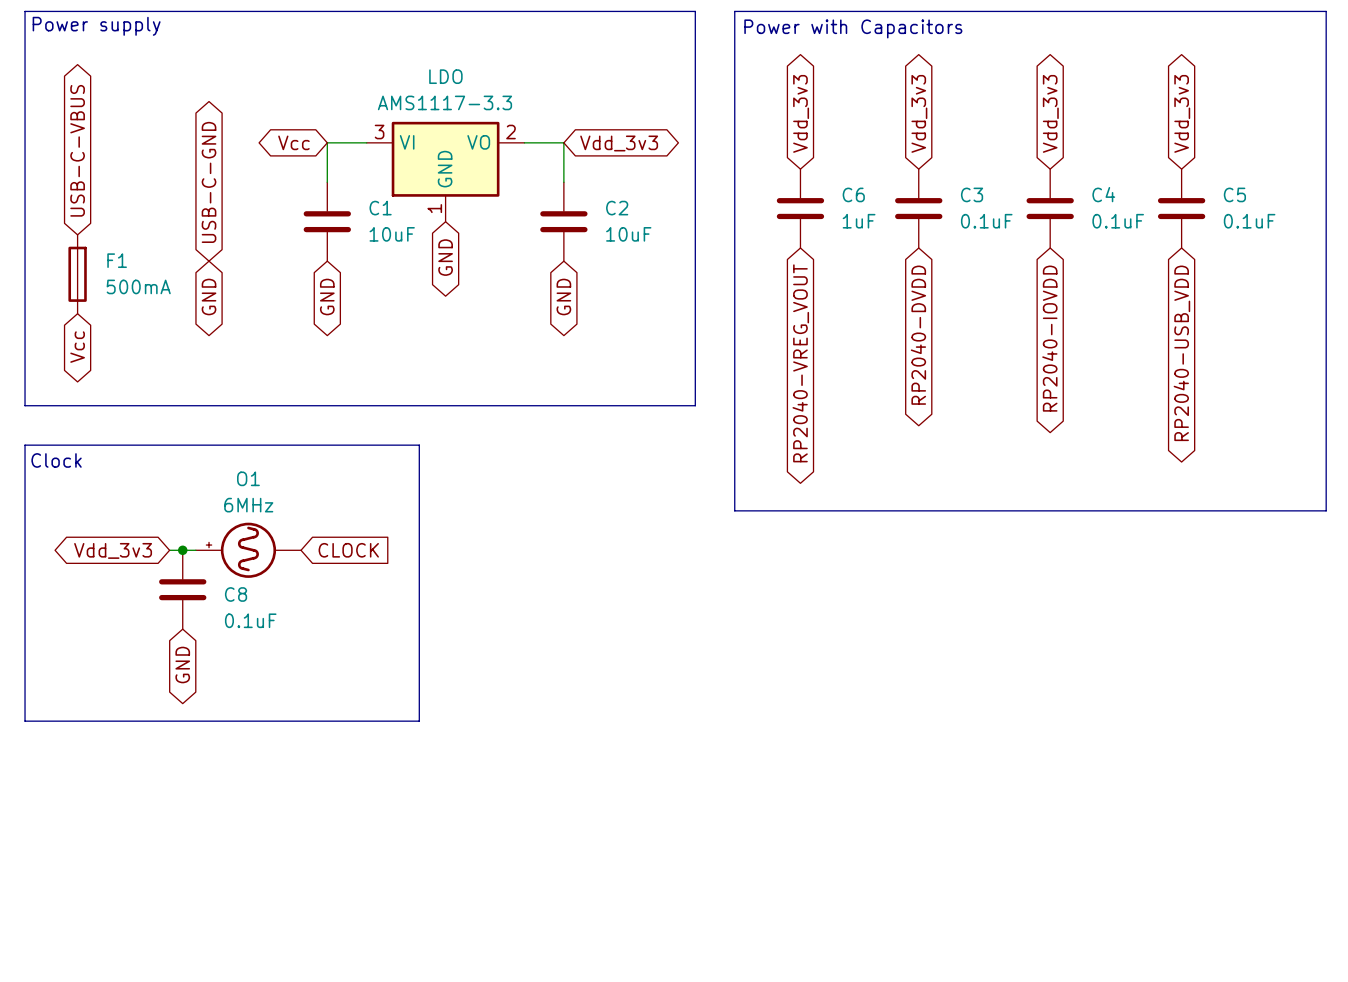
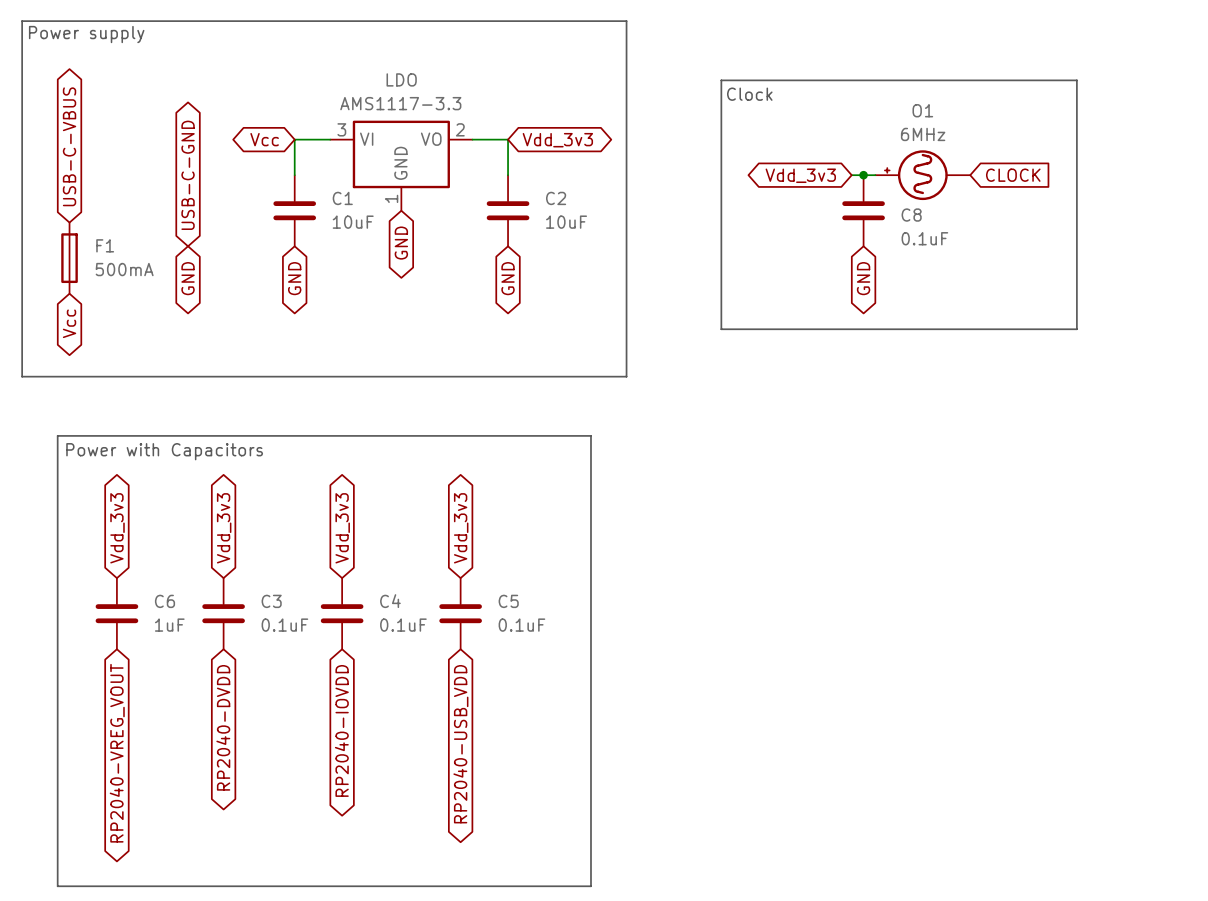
line: (734, 11) (1326, 11) (1326, 510) (734, 510) (734, 11) -> none
text: Power with Capacitors (853, 28) -> none
line: none -> (721, 80) (1076, 80) (1076, 329) (721, 329) (721, 80)
text: none -> Clock (749, 94)
global label: Vdd_3v3 (801, 113) -> none
global label rotation: 0° (919, 113) -> 90° counterclockwise (800, 175)
global label: Vdd_3v3 (1050, 113) -> none
global label: Vdd_3v3 (1182, 113) -> none
wire: none -> (851, 175) (875, 175)
junction: none -> (863, 175)
global label: none -> CLOCK (1013, 175)
C6 position: (800, 208) -> (116, 613)
C3 position: (918, 208) -> (223, 613)
C4 position: (1050, 208) -> (342, 613)
C5 position: (1181, 208) -> (460, 613)
global label: none -> GND (863, 278)
global label: RP2040-DVDD (918, 335) -> none
global label: RP2040-IOVDD (1049, 338) -> none
global label: RP2040-USB_VDD (1181, 353) -> none
global label: RP2040-VREG_VOUT (800, 363) -> none
line: (25, 445) (25, 721) (419, 721) (419, 445) (25, 445) -> none
text: Clock (56, 460) -> none
line: none -> (57, 435) (590, 435) (590, 886) (57, 886) (57, 435)
text: none -> Power with Capacitors (164, 451)
global label rotation: 0° (113, 550) -> 90° clockwise (117, 528)
wire: (169, 550) (195, 550) -> none
junction: (182, 550) -> none
O1 position: (248, 550) -> (922, 175)
global label: CLOCK (348, 550) -> none
global label: none -> Vdd_3v3 (224, 528)
global label: none -> Vdd_3v3 (342, 528)
global label: none -> Vdd_3v3 (461, 528)
C8 position: (182, 589) -> (863, 210)
global label: GND (182, 665) -> none
global label: none -> RP2040-DVDD (223, 727)
global label: none -> RP2040-IOVDD (341, 730)
global label: none -> RP2040-USB_VDD (460, 744)
global label: none -> RP2040-VREG_VOUT (117, 753)

